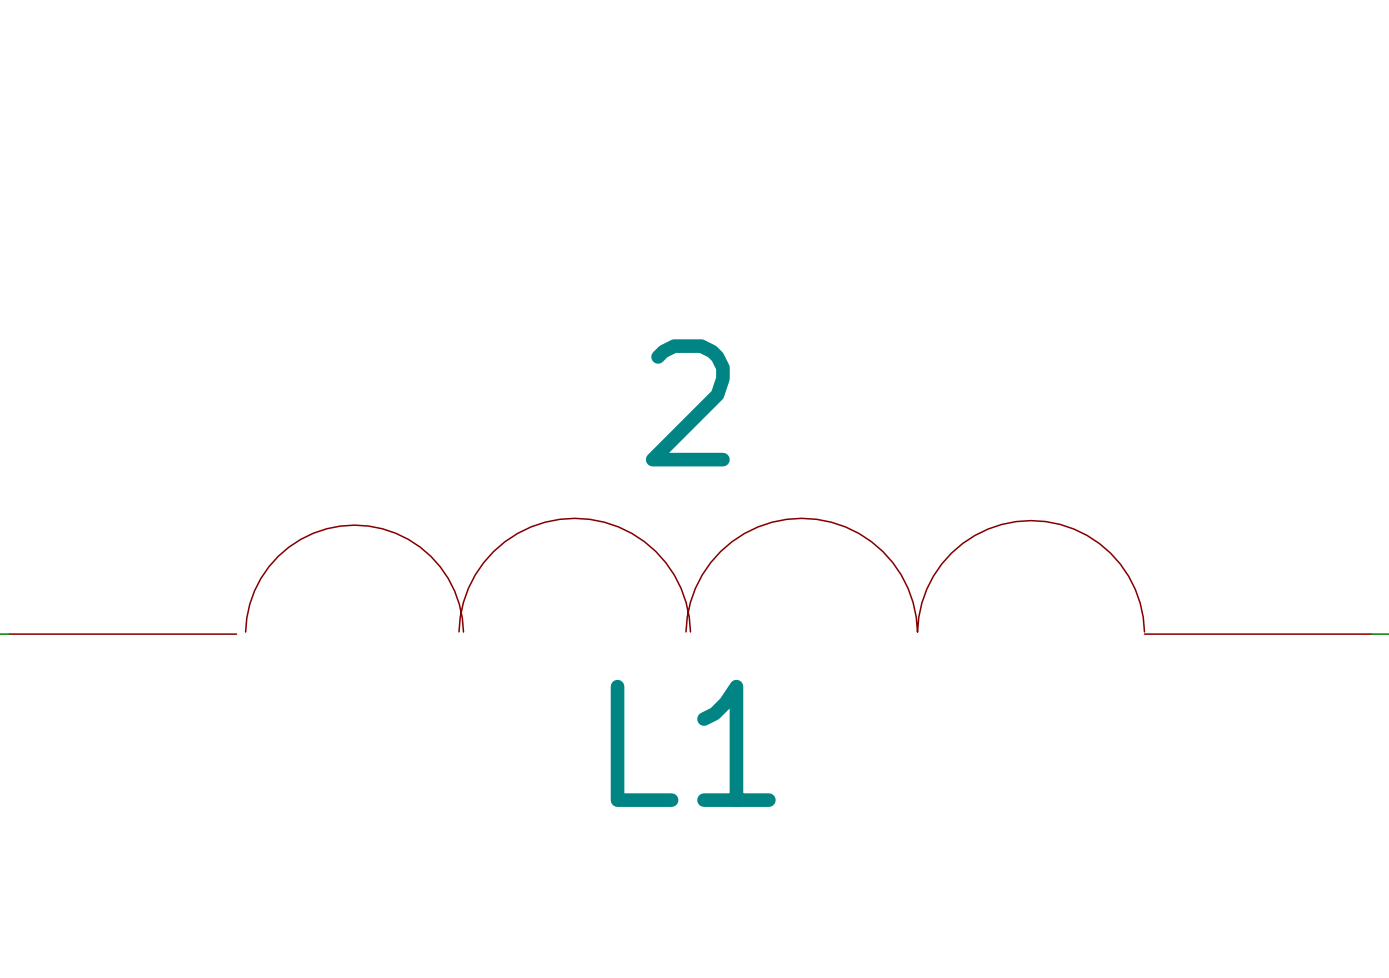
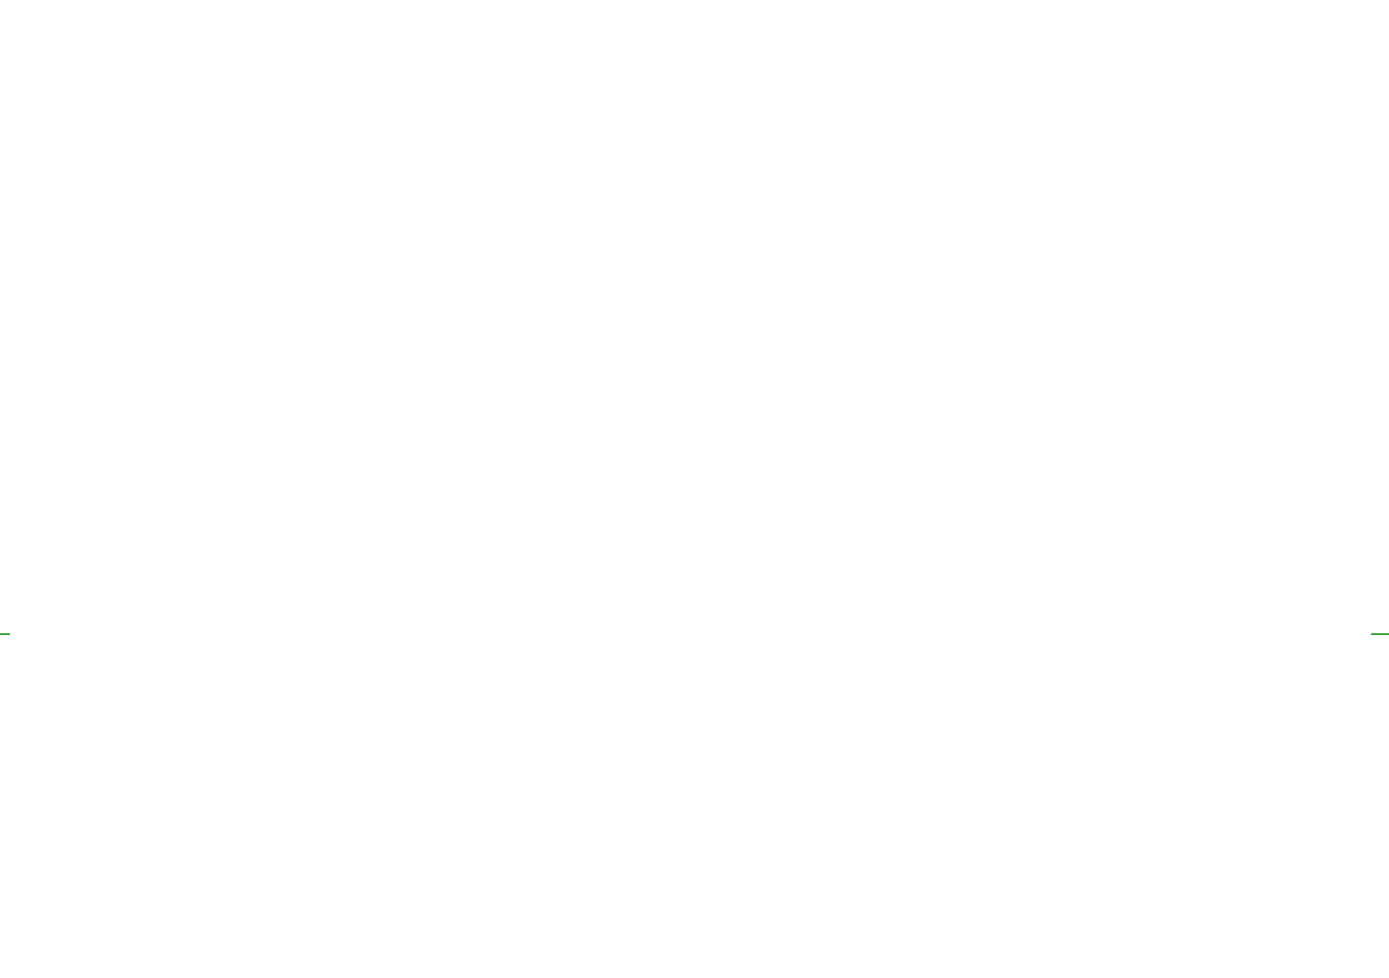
L1: 2 (690, 576) -> none

